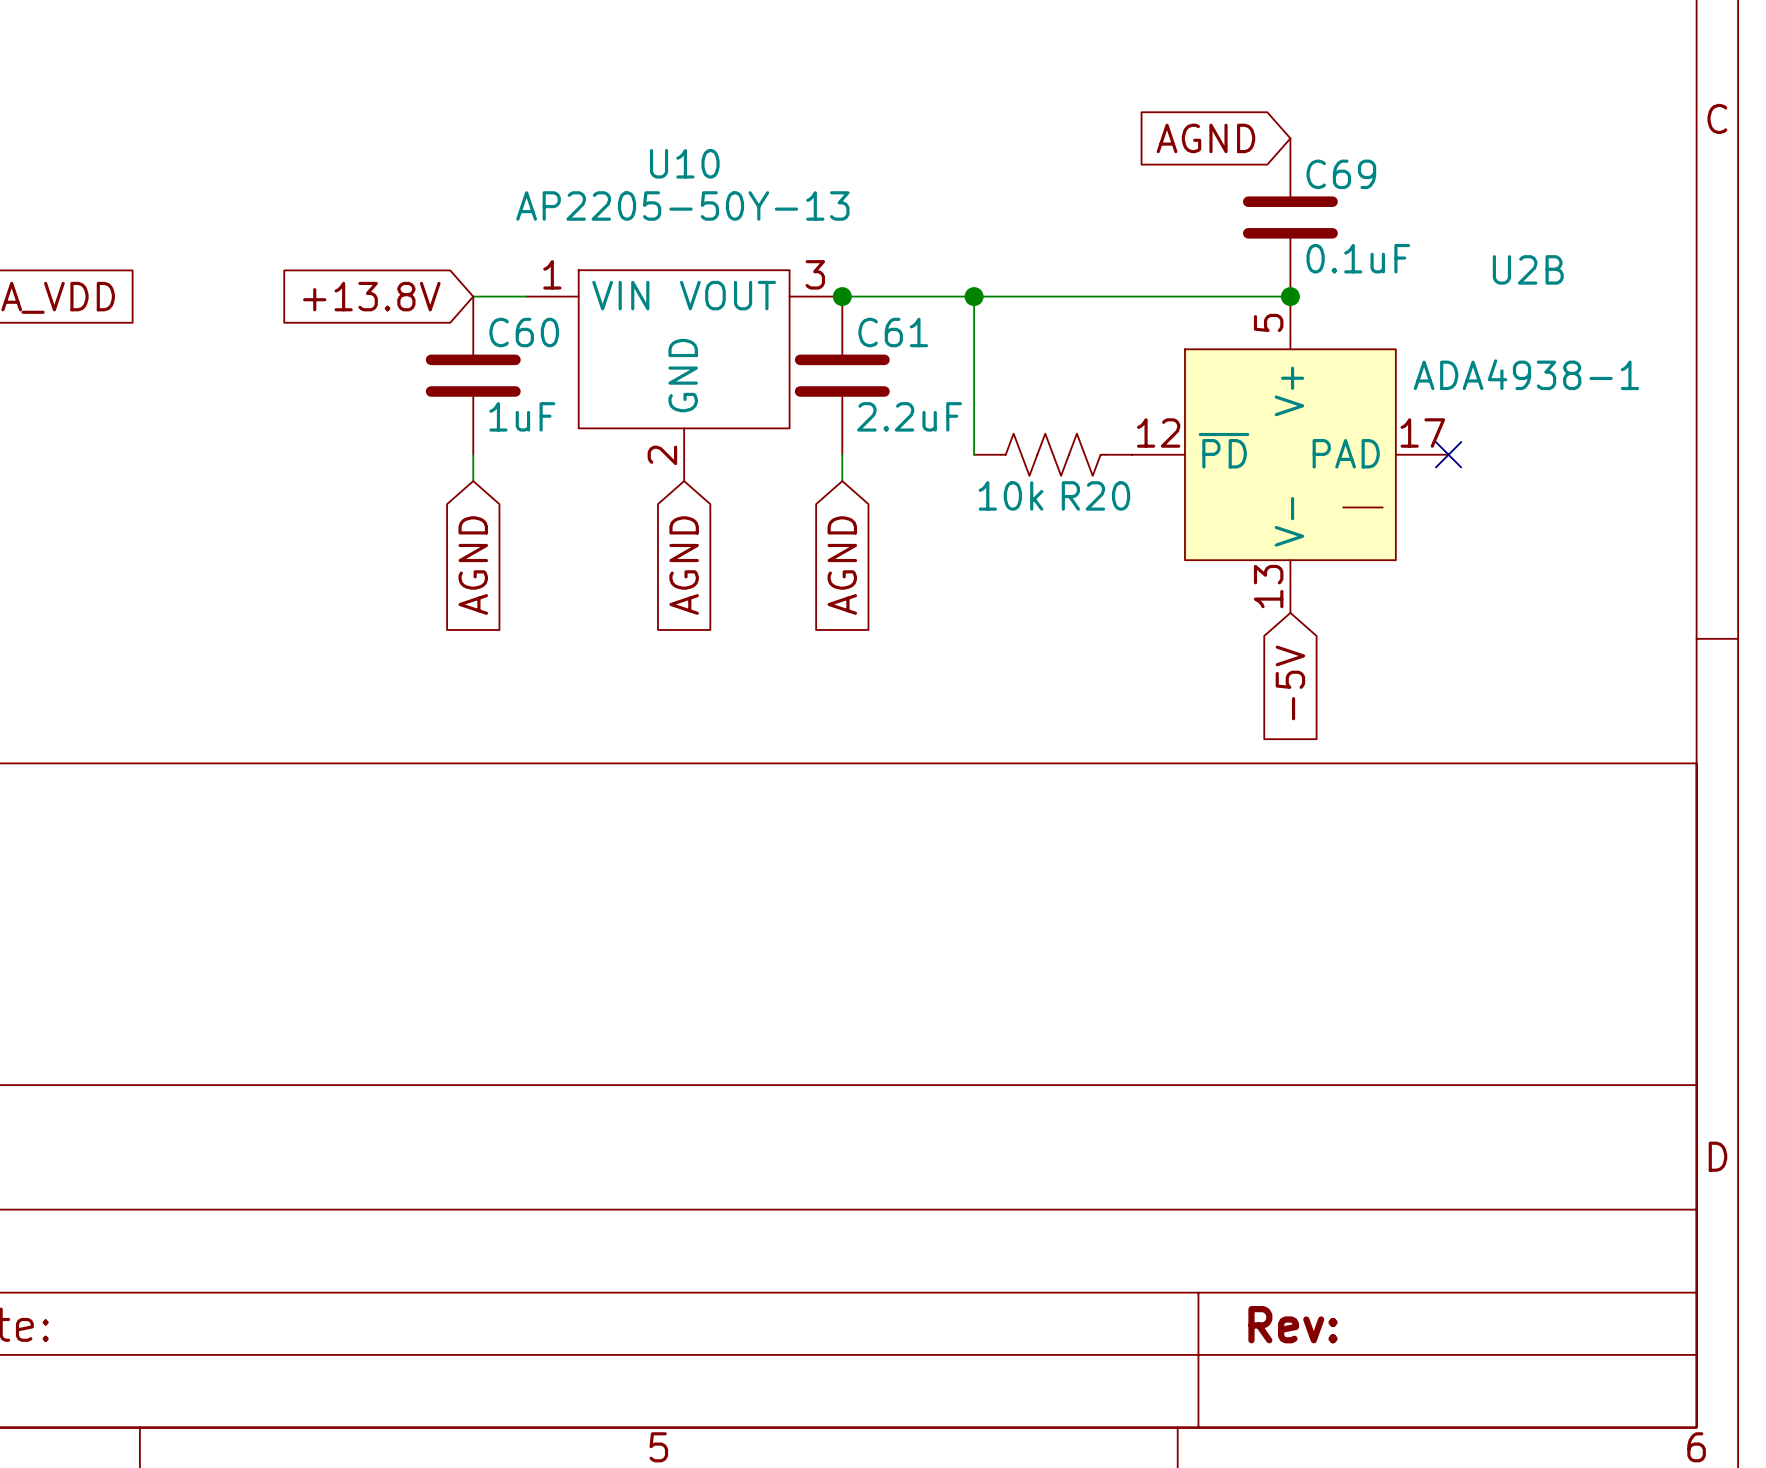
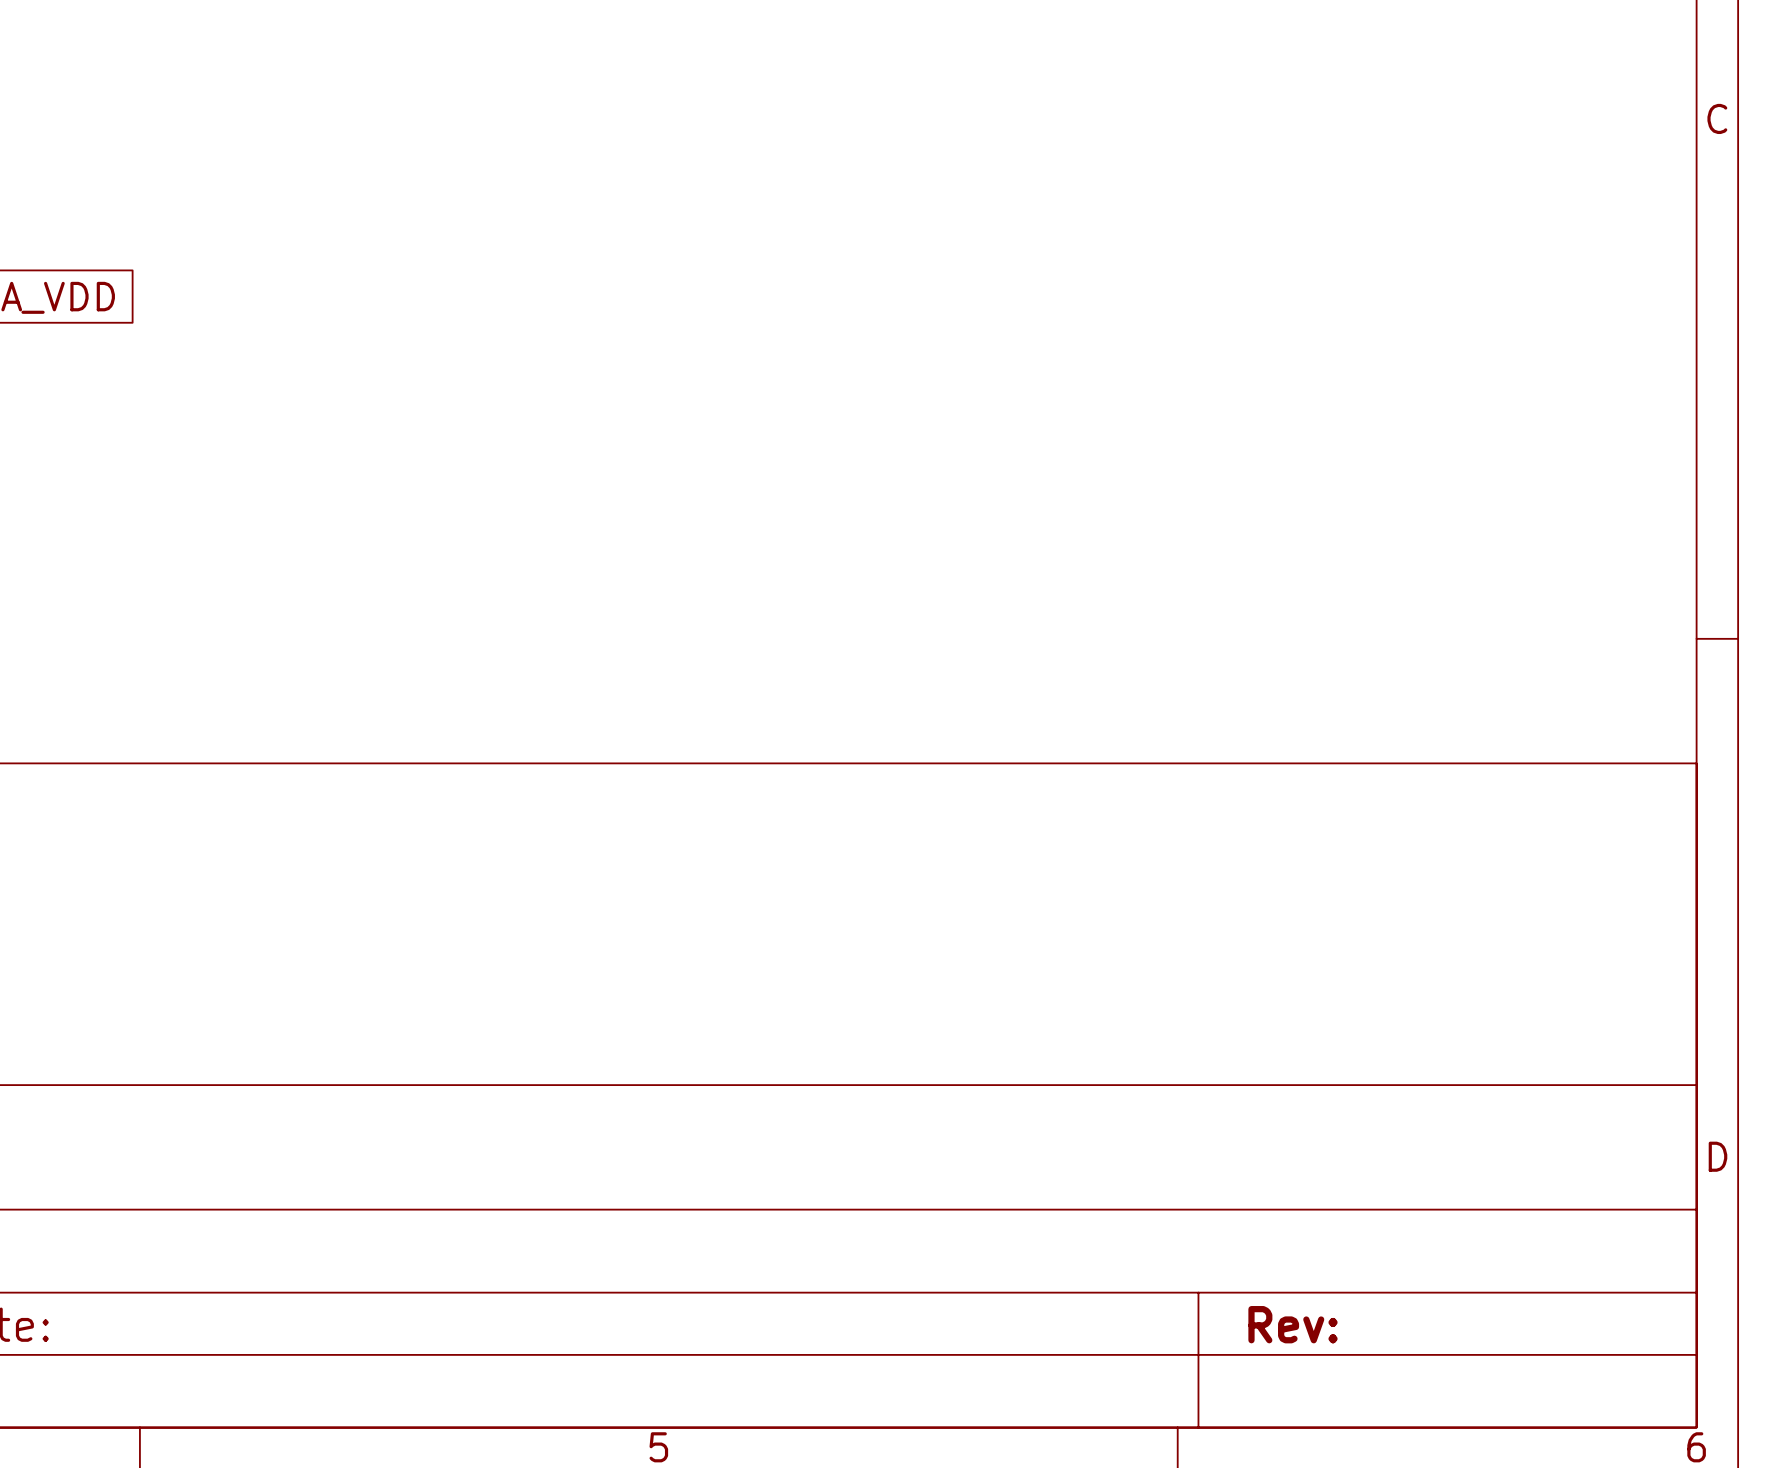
global label: AGND (1205, 138) -> none
C69: 0.1uF (1290, 217) -> none
global label: +13.8V (371, 296) -> none
wire: (473, 296) (525, 296) -> none
wire: (842, 296) (1290, 296) -> none
junction: (842, 296) -> none
wire: (974, 296) (974, 454) -> none
junction: (974, 296) -> none
junction: (1290, 296) -> none
C60: 1uF (473, 375) -> none
U10: AP2205-50Y-13 (684, 375) -> none
C61: 2.2uF (842, 375) -> none
wire: (473, 454) (473, 481) -> none
wire: (842, 454) (842, 481) -> none
R20: 10k (1053, 454) -> none
U2B: ADA4938-1 (1290, 454) -> none
no-connect mark: (1448, 454) -> none
global label: AGND (473, 565) -> none
global label: AGND (684, 565) -> none
global label: AGND (842, 565) -> none
global label: -5V (1290, 682) -> none

